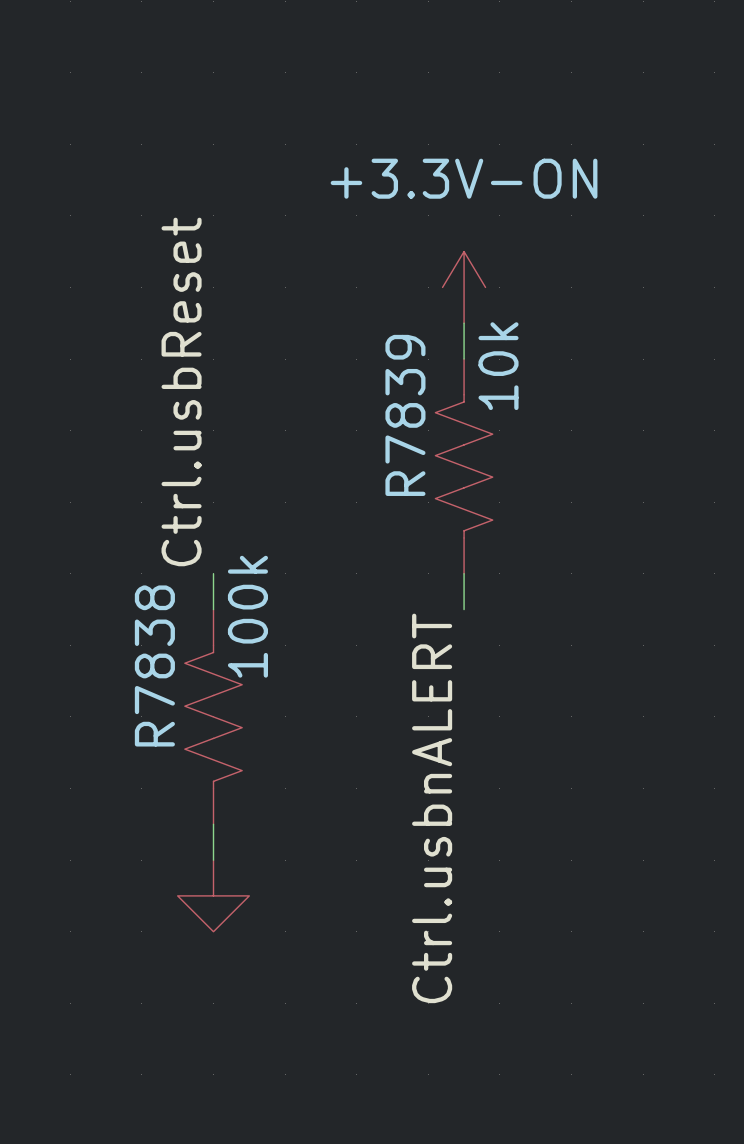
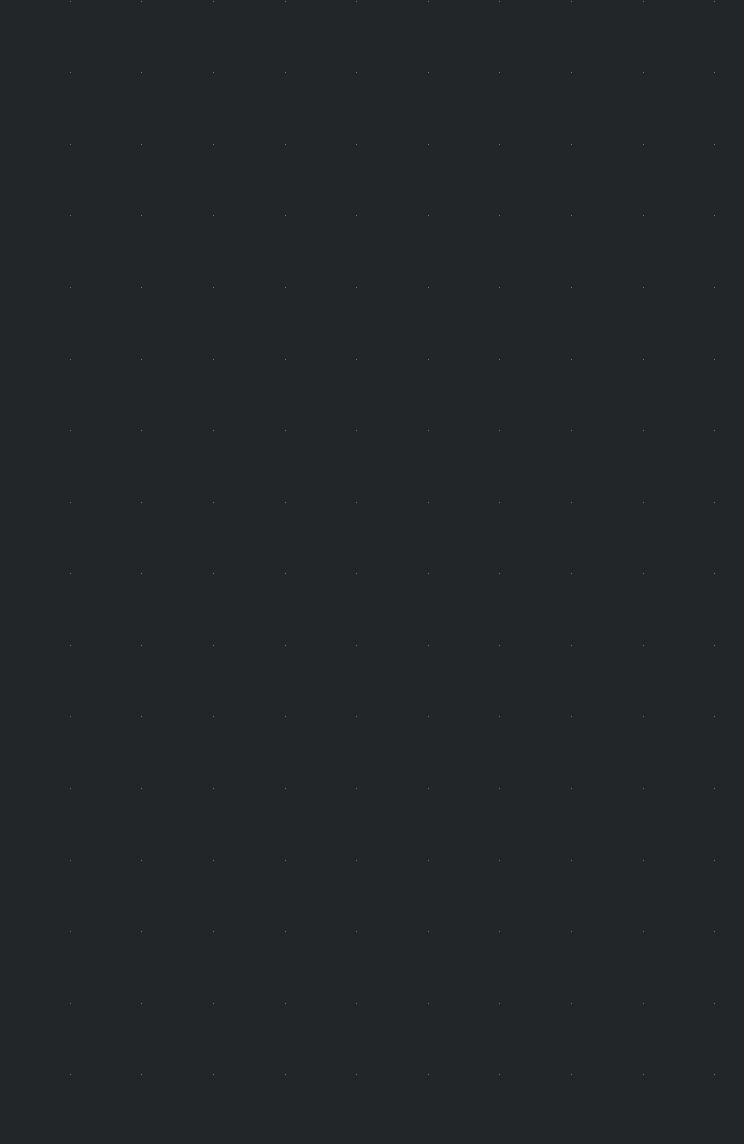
power symbol: +3.3V-ON (464, 287) -> none
wire: (464, 323) (464, 359) -> none
label: Ctrl.usbReset (181, 391) -> none
R7839: 10k (464, 466) -> none
wire: (213, 573) (213, 609) -> none
wire: (464, 573) (464, 609) -> none
R7838: 100k (213, 716) -> none
label: Ctrl.usbnALERT (432, 808) -> none
wire: (213, 824) (213, 860) -> none
power symbol: (213, 895) -> none

